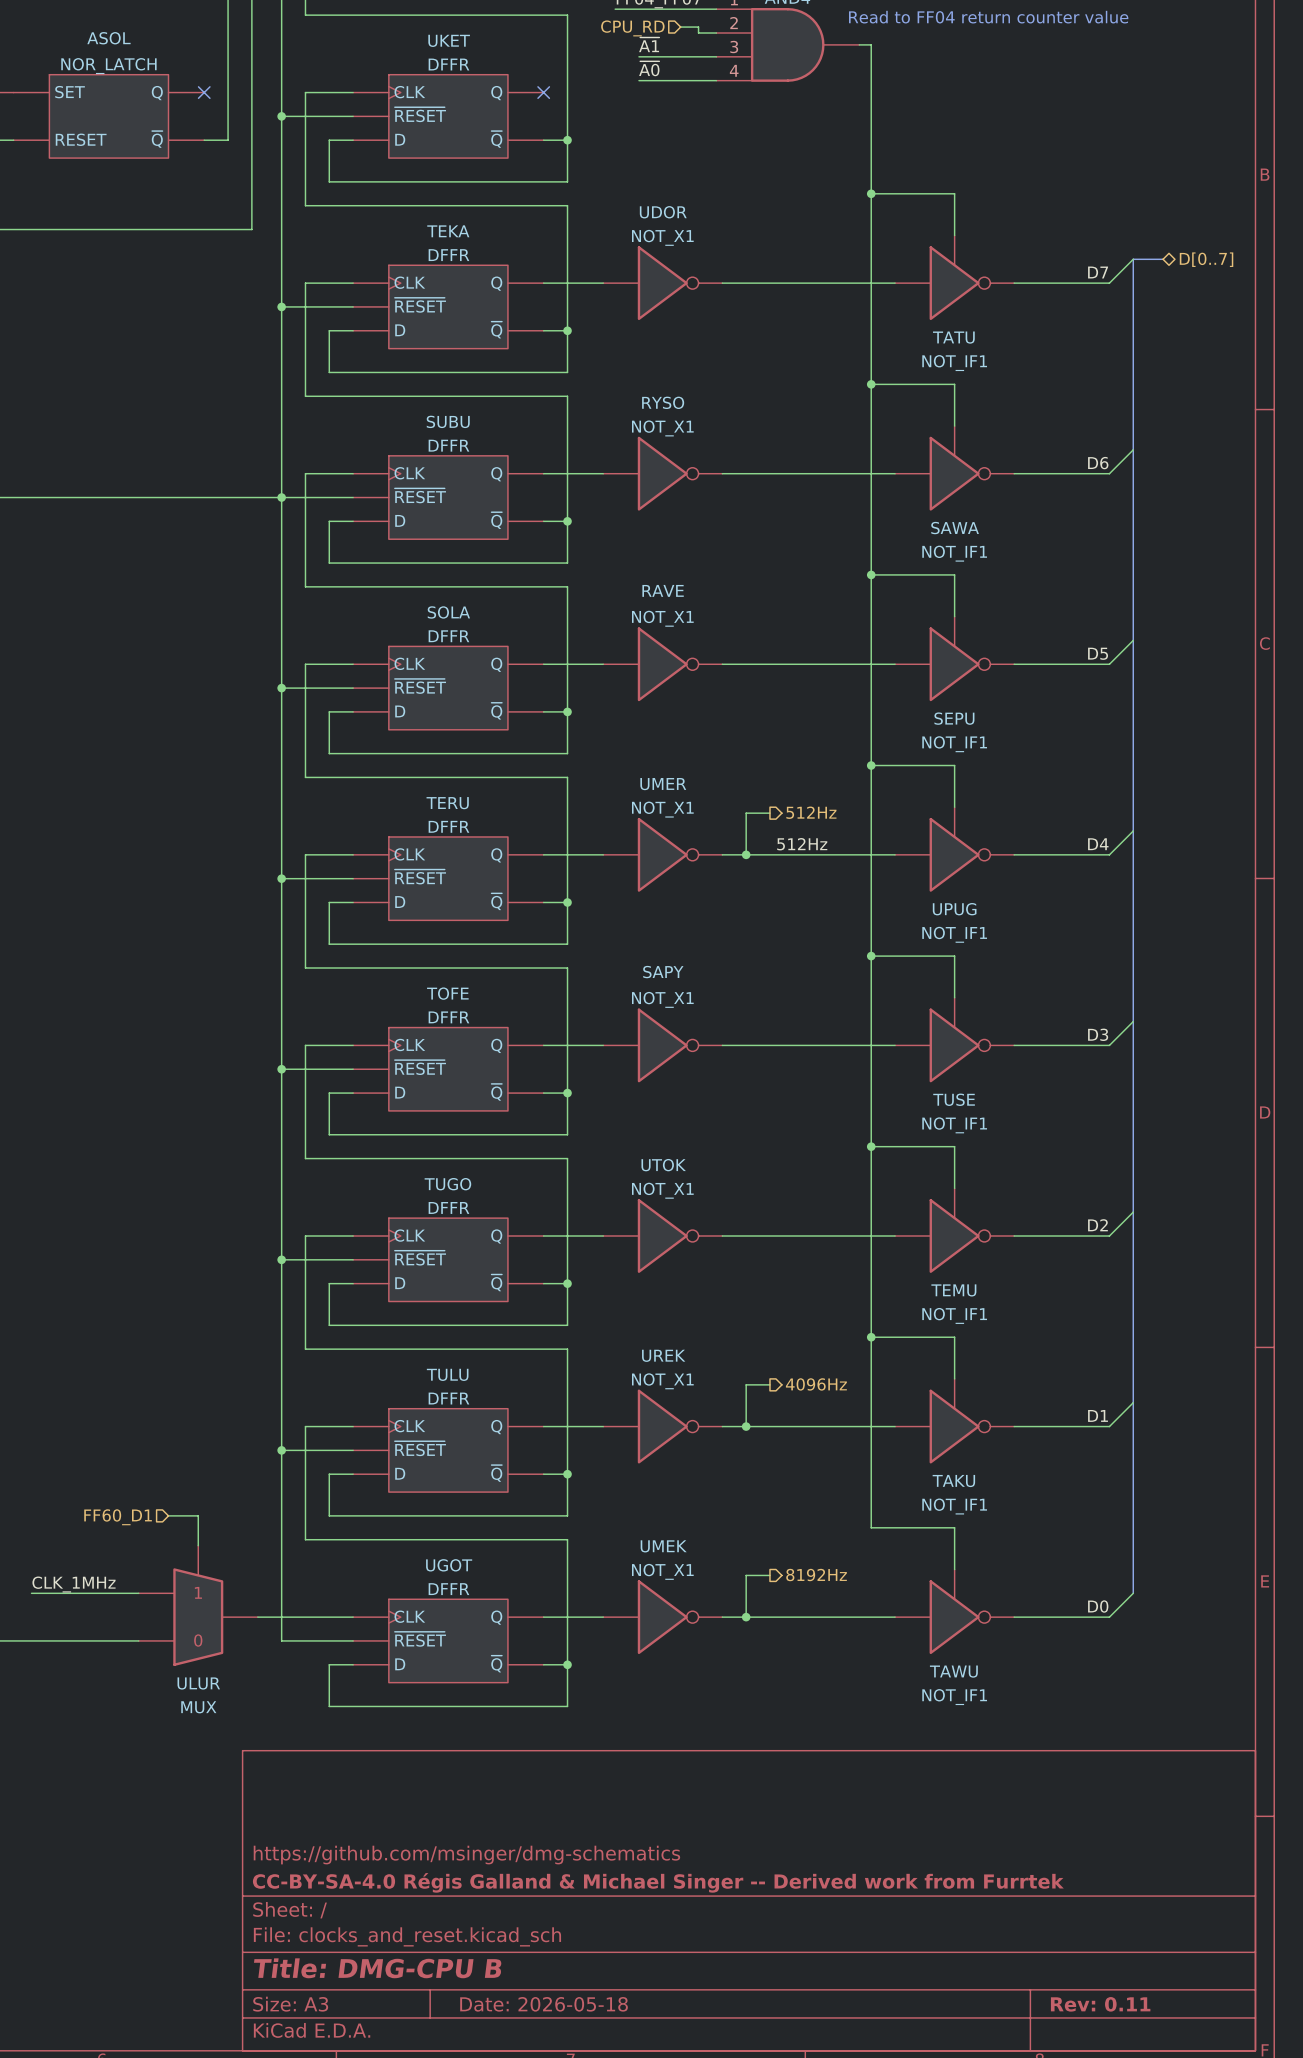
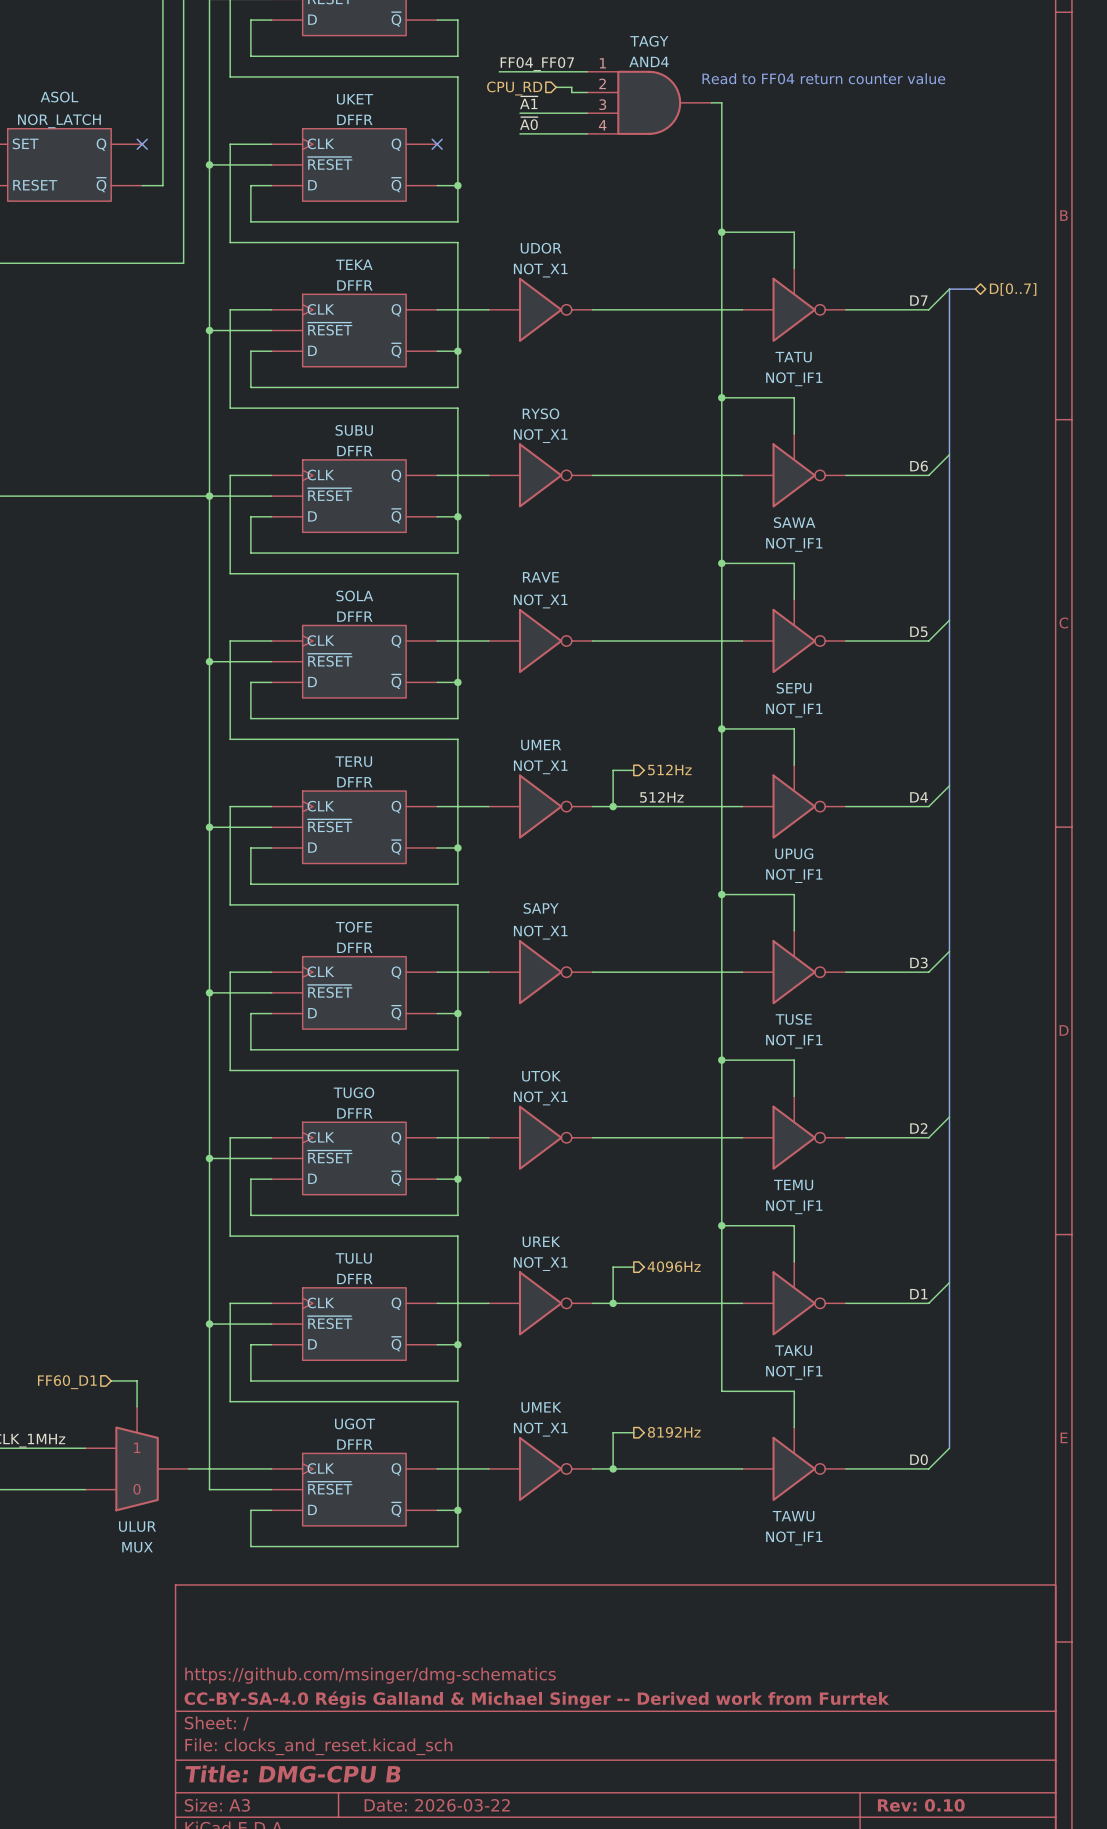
title block: Date: 2026-05-18 (544, 2004) -> Date: 2026-03-22 (437, 1805)
title block: Rev: 0.11 (1100, 2004) -> Rev: 0.10 (921, 1805)

